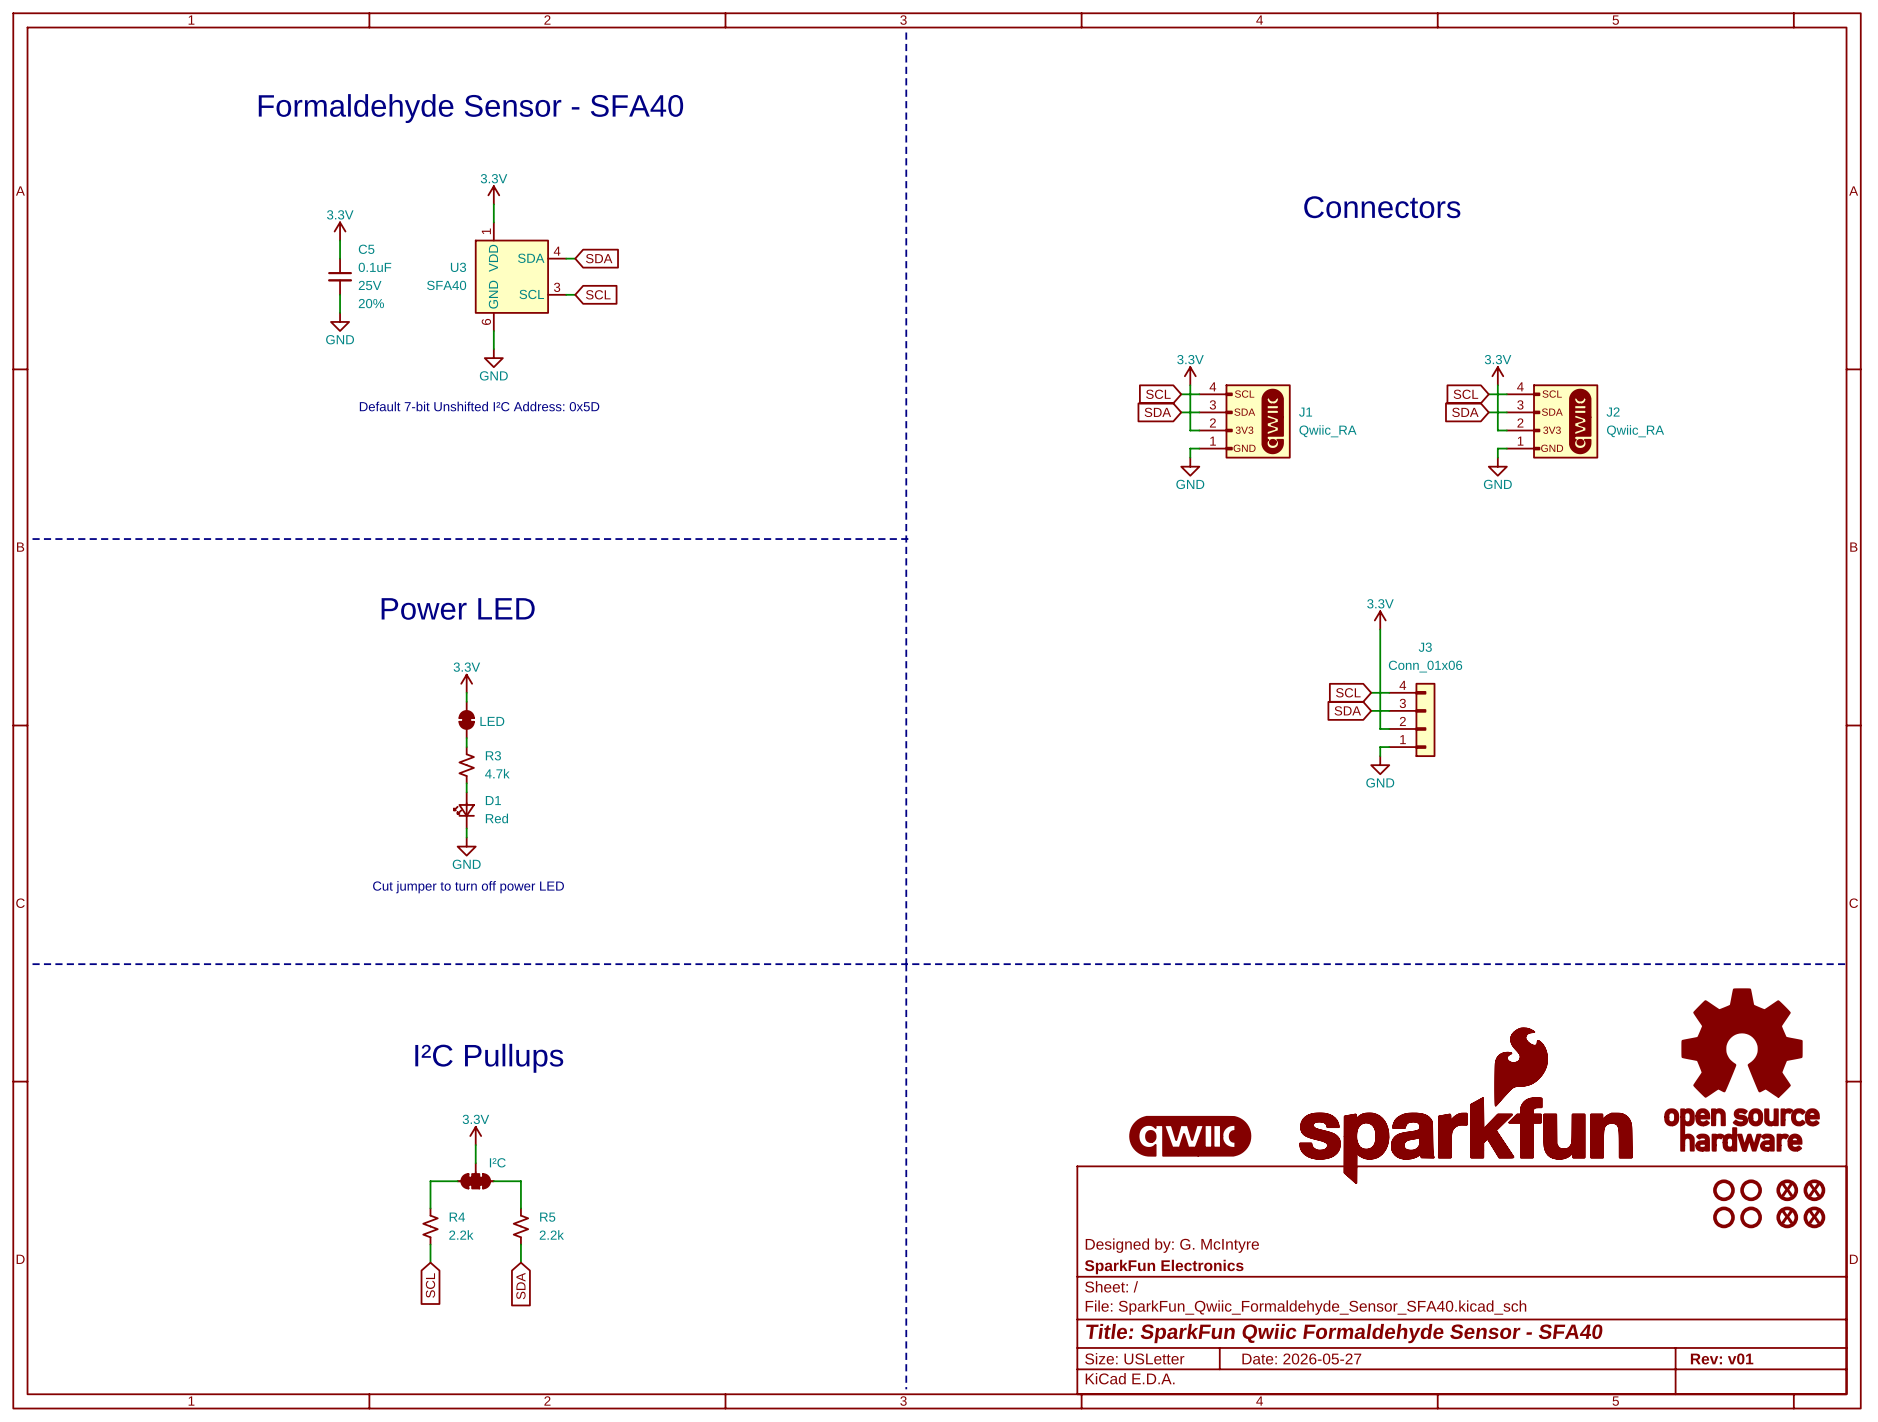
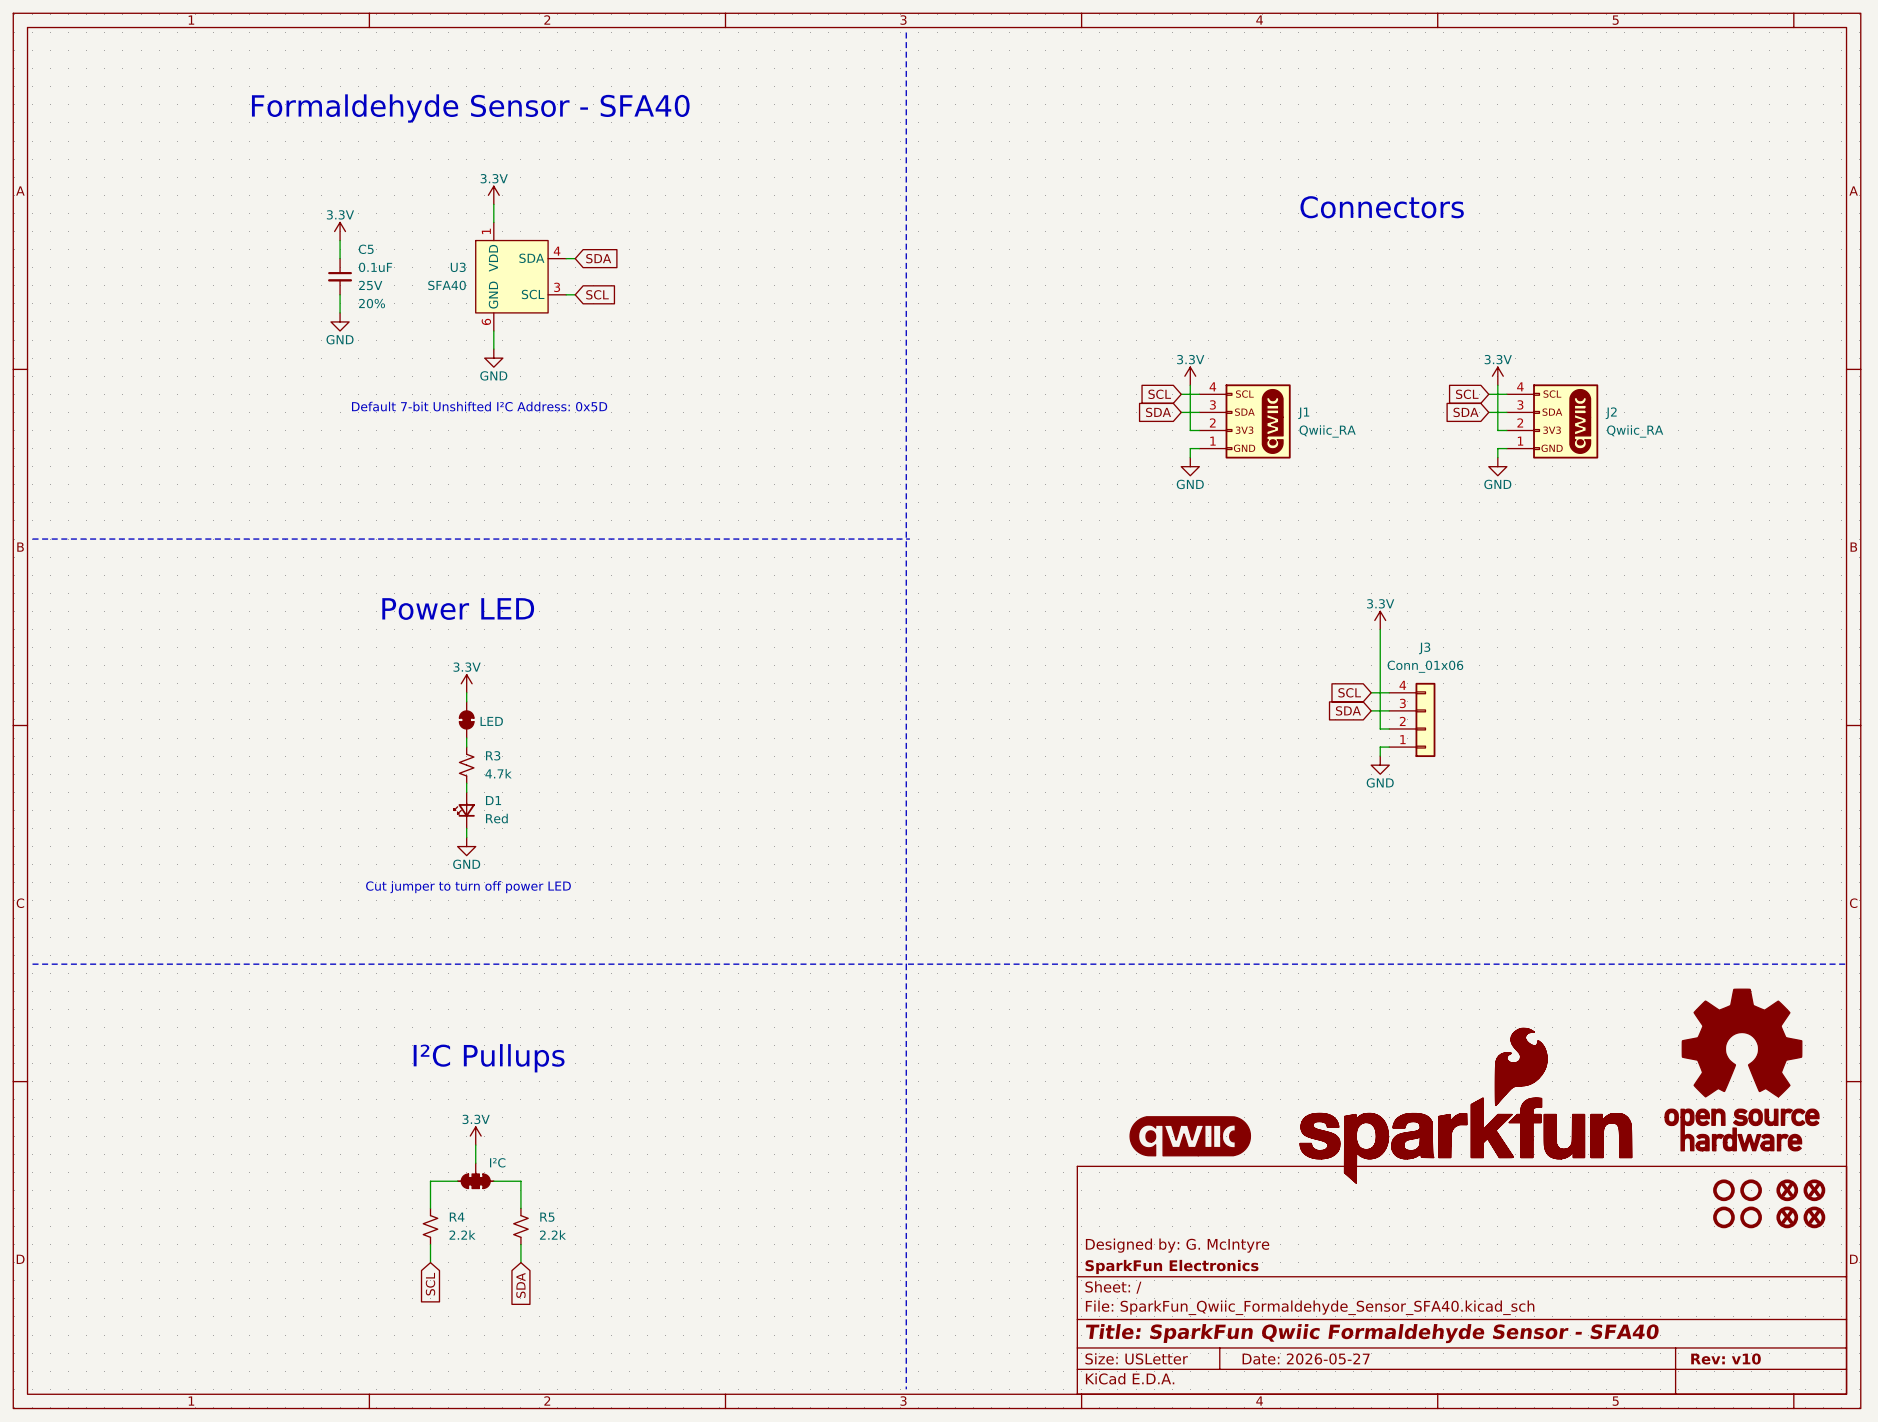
title block: Rev: v01 (1722, 1358) -> Rev: v10 (1726, 1358)

